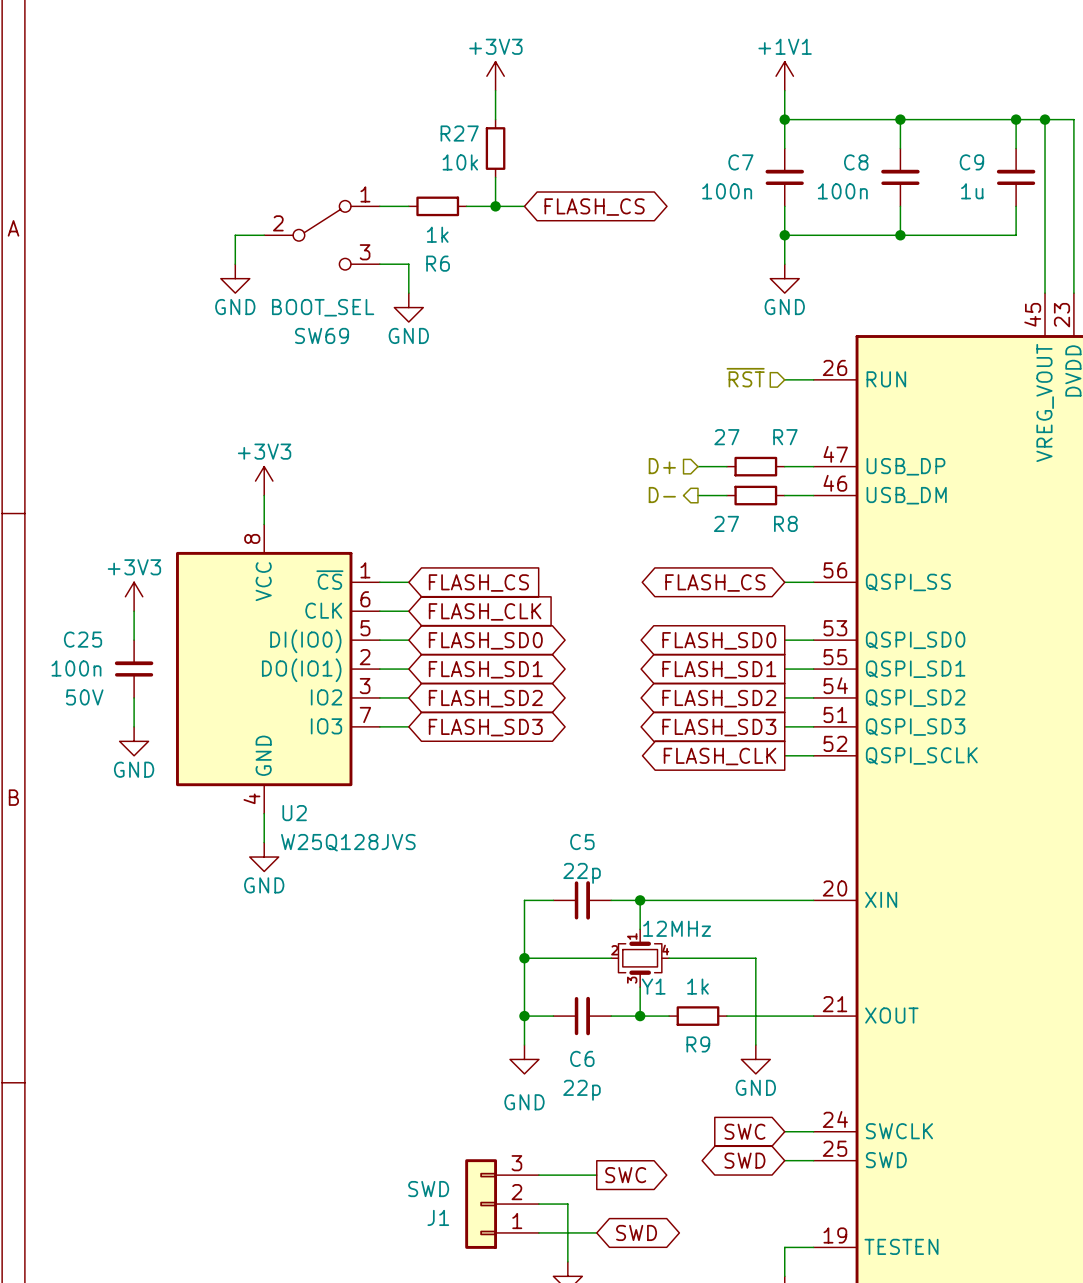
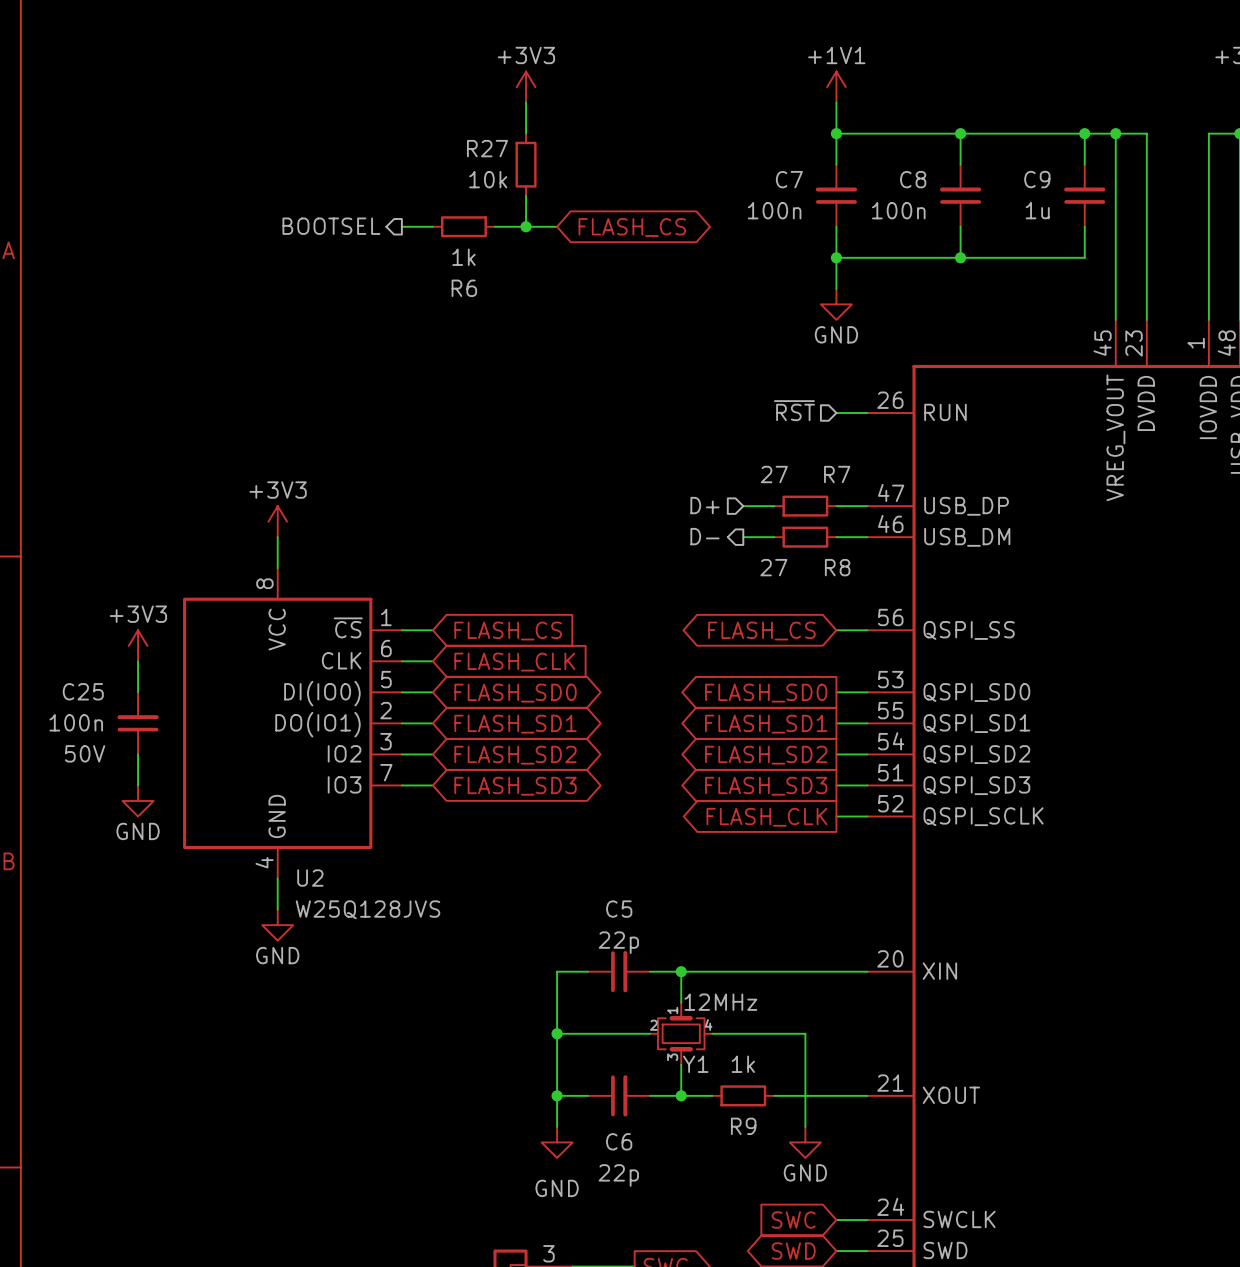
hierarchical label: none -> BOOTSEL (331, 226)
wire: (264, 235) (235, 235) (235, 264) -> none
SW69: BOOT_SEL (322, 235) -> none
wire: (379, 264) (408, 264) (408, 293) -> none
power symbol: GND (235, 278) -> none
power symbol: GND (408, 307) -> none

